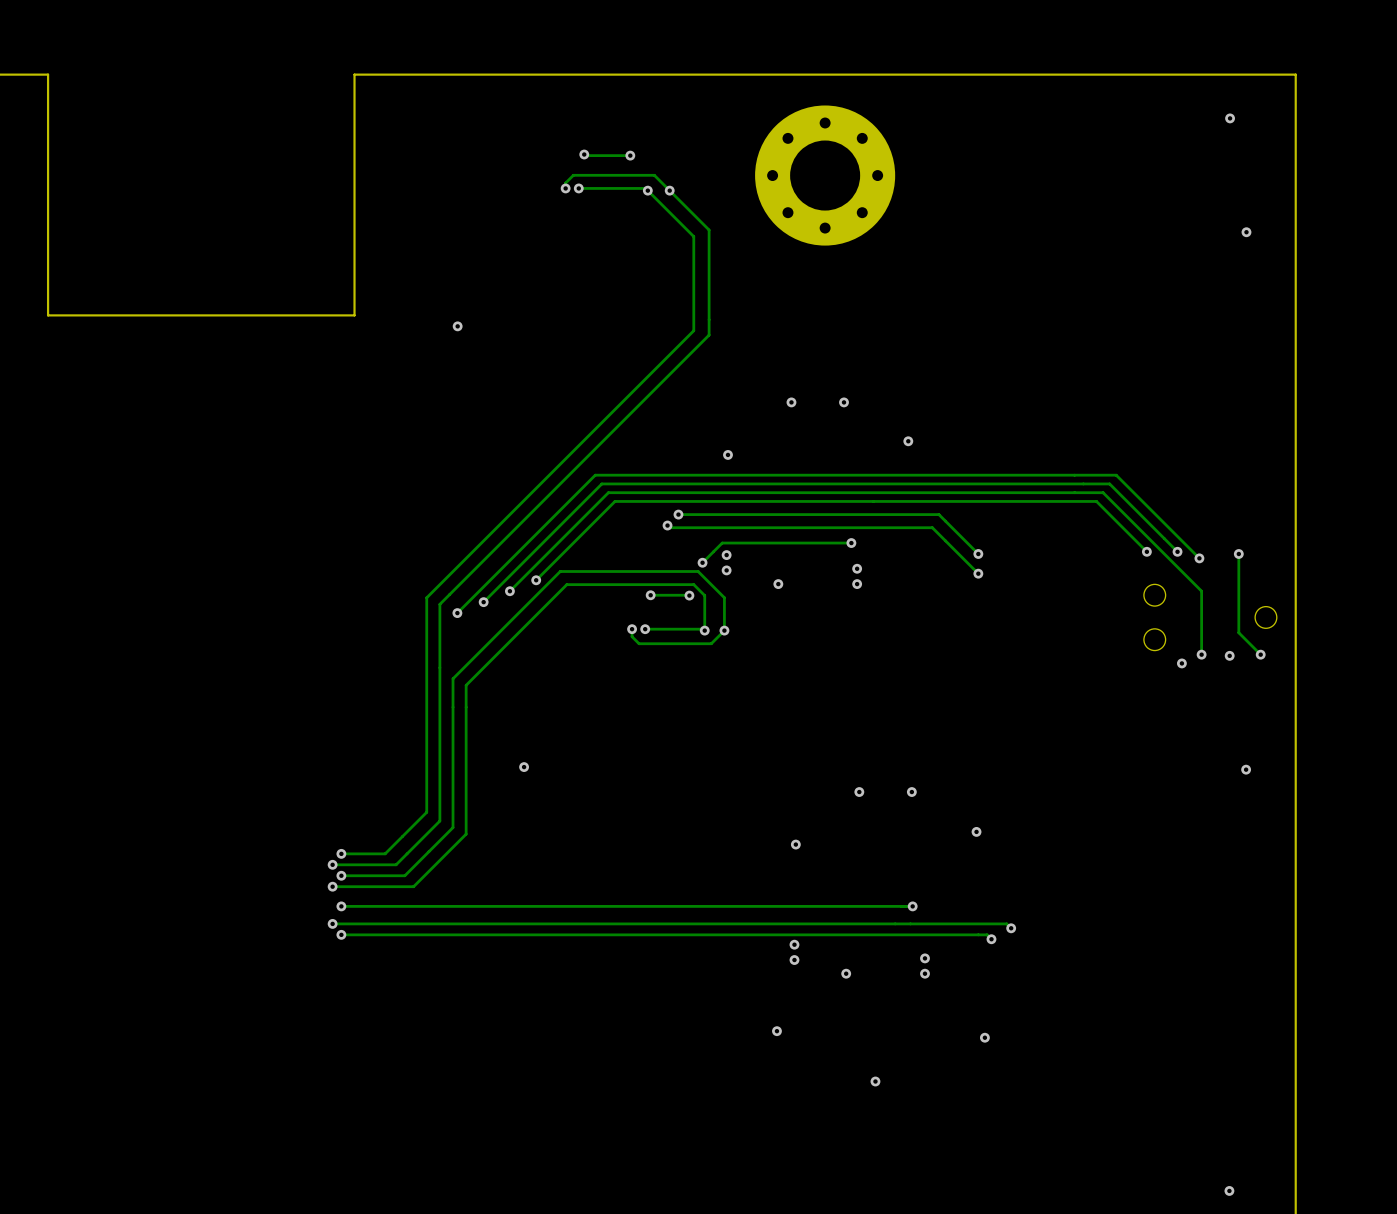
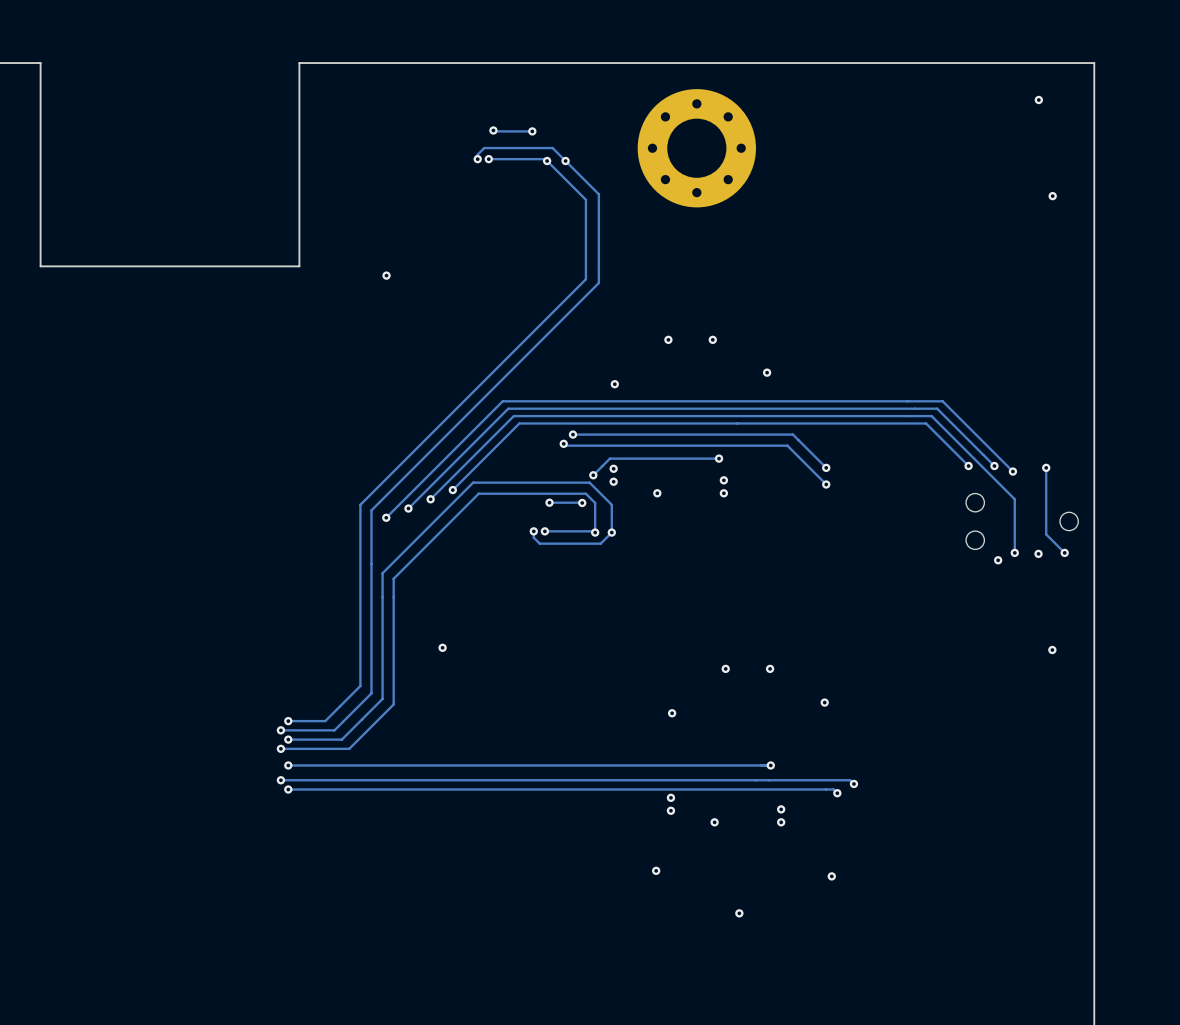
via: (1229, 1190) -> none

